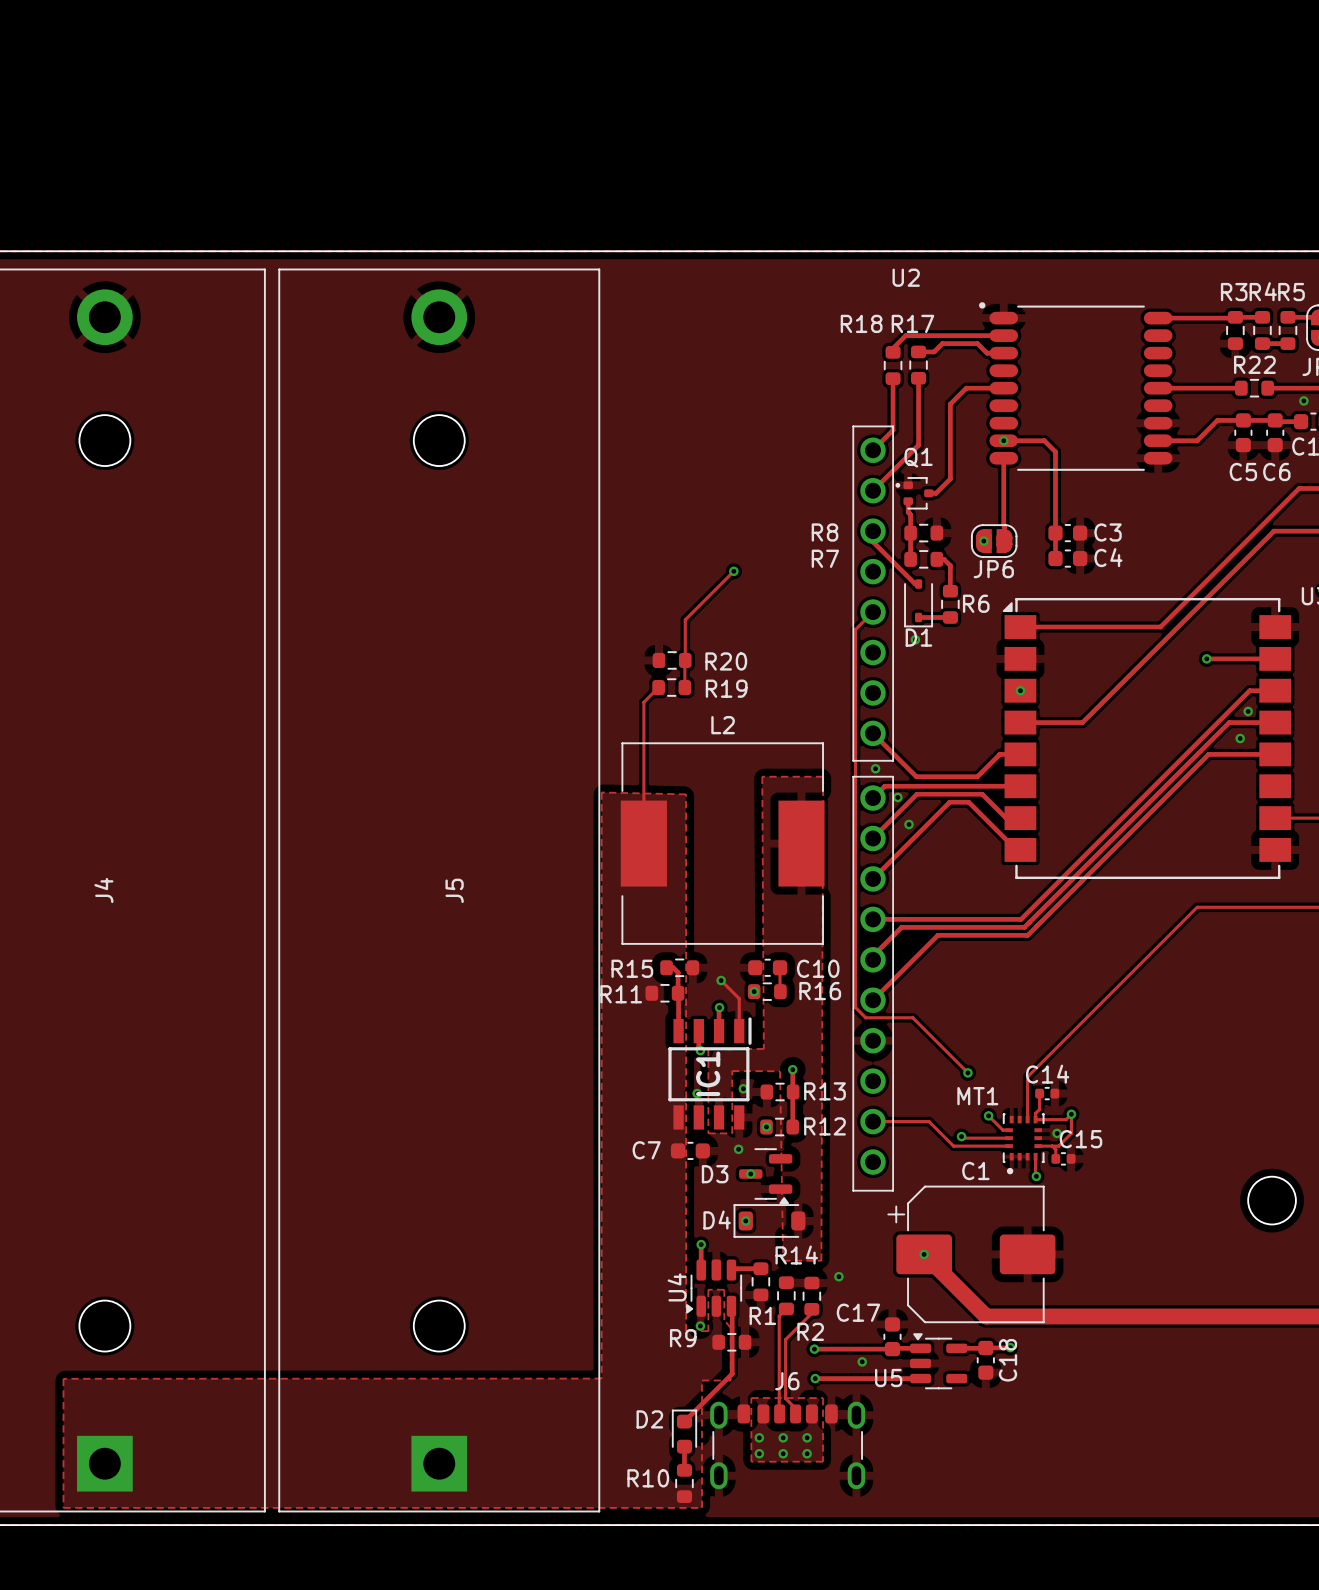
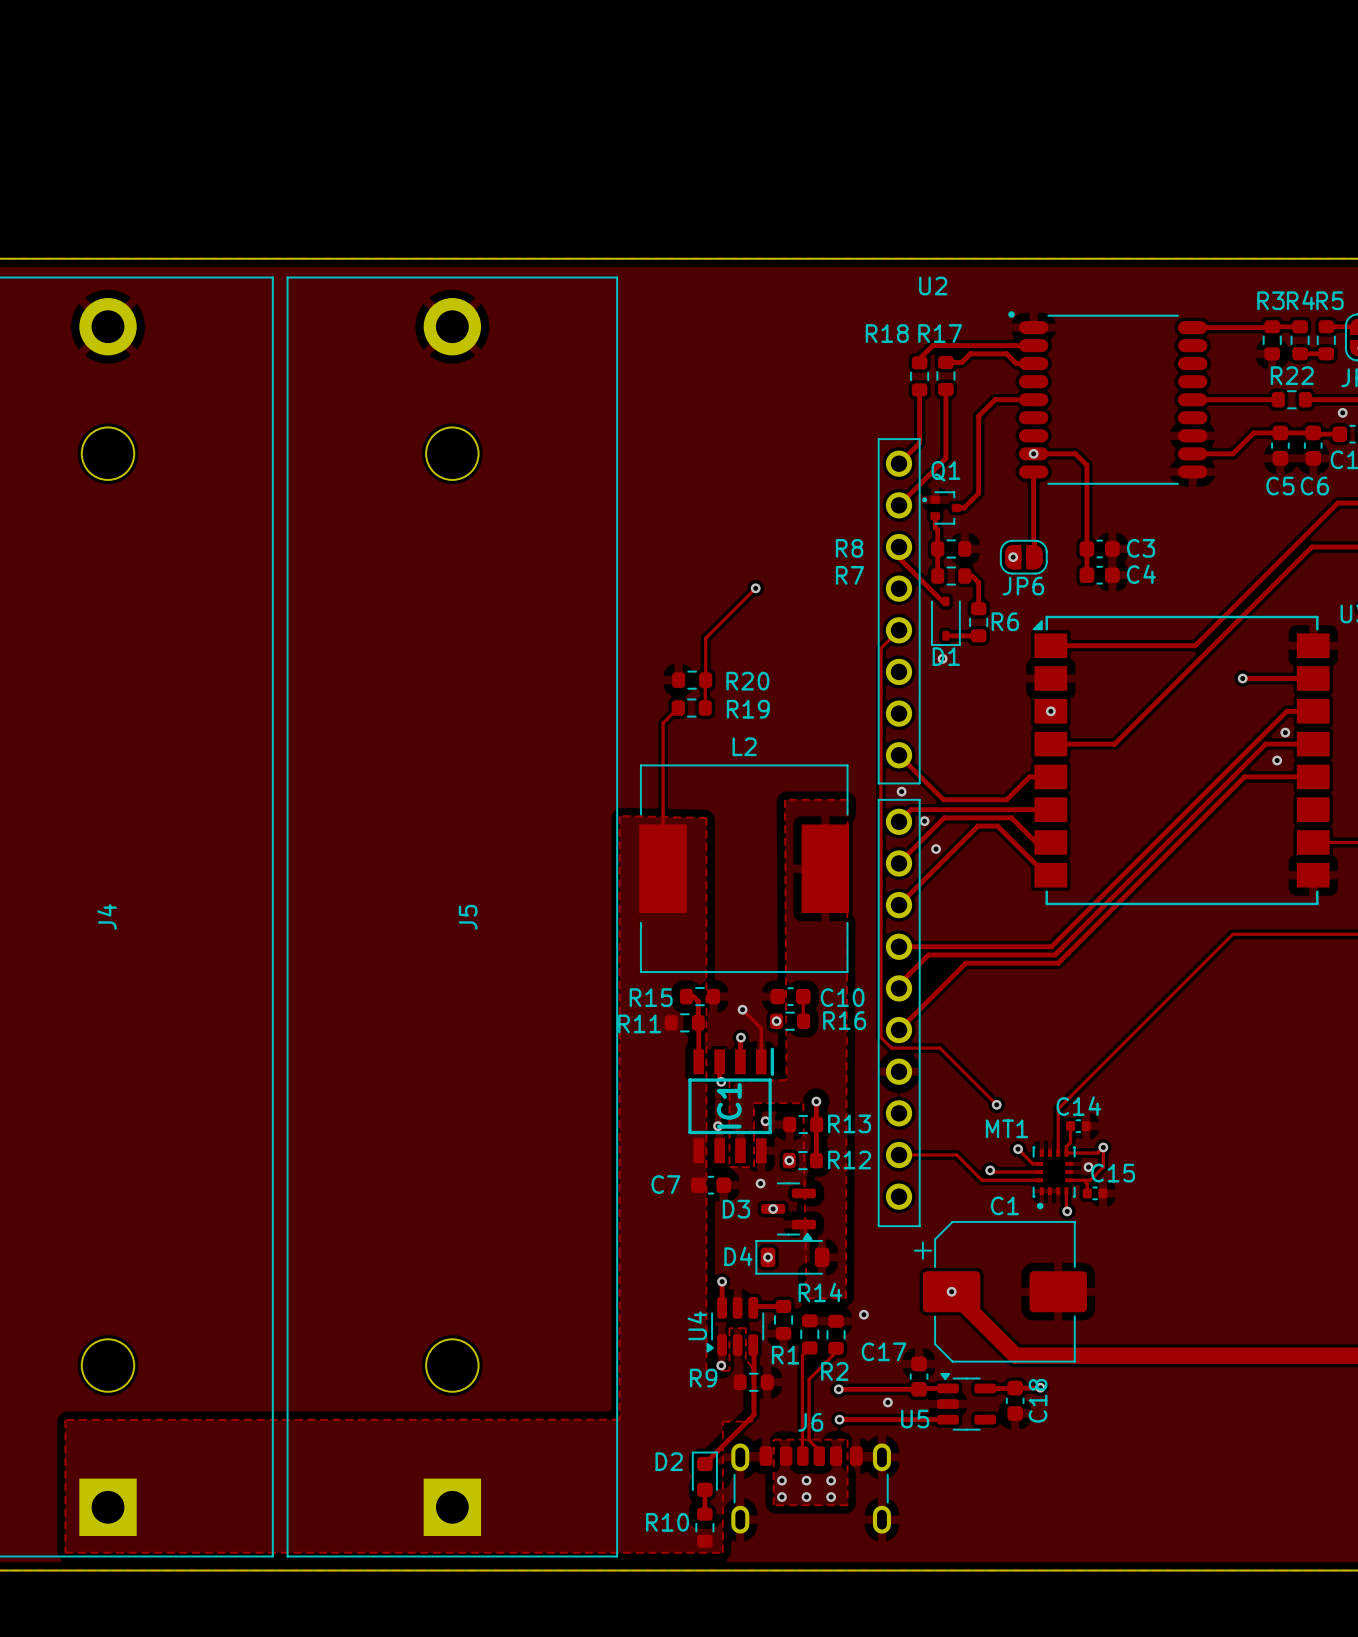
round board edge: [1247, 1175, 1297, 1226] -> none

